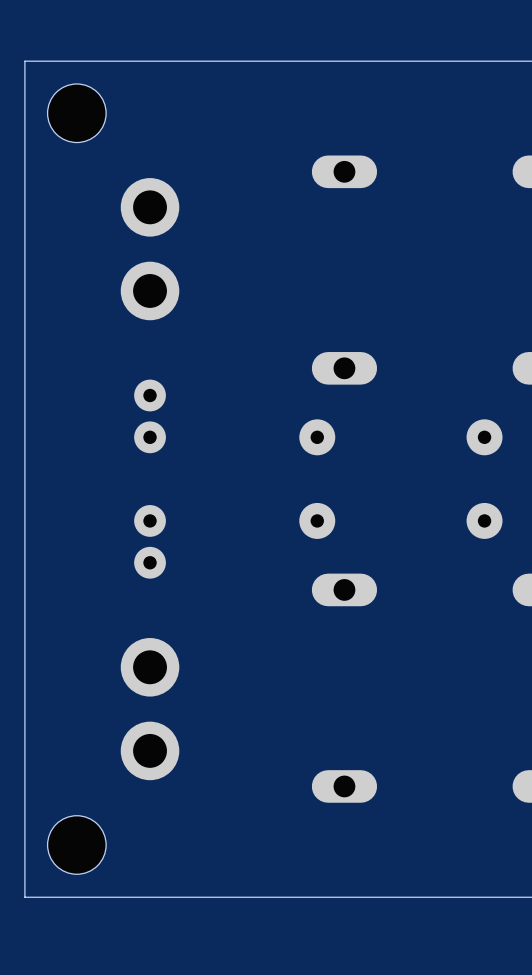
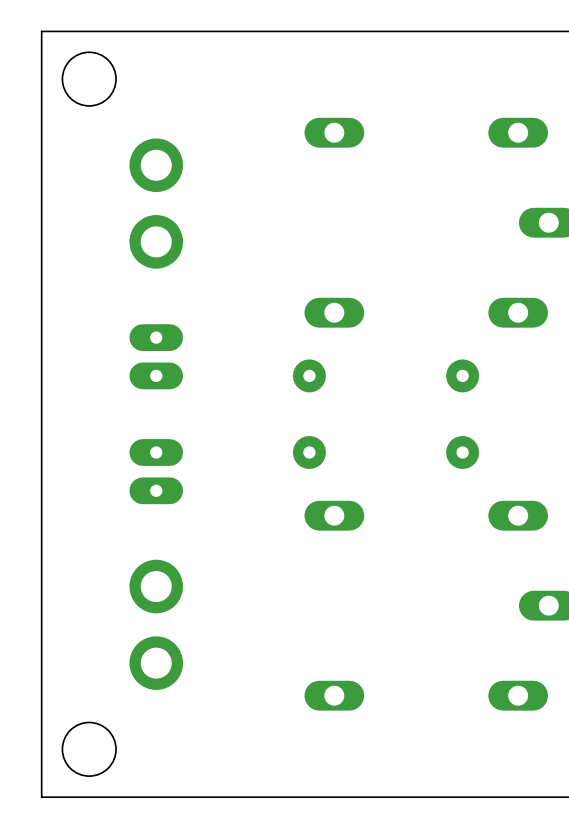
part footprint: [134, 379, 166, 454] -> [129, 324, 184, 390]
part footprint: [134, 505, 166, 579] -> [129, 439, 184, 505]

